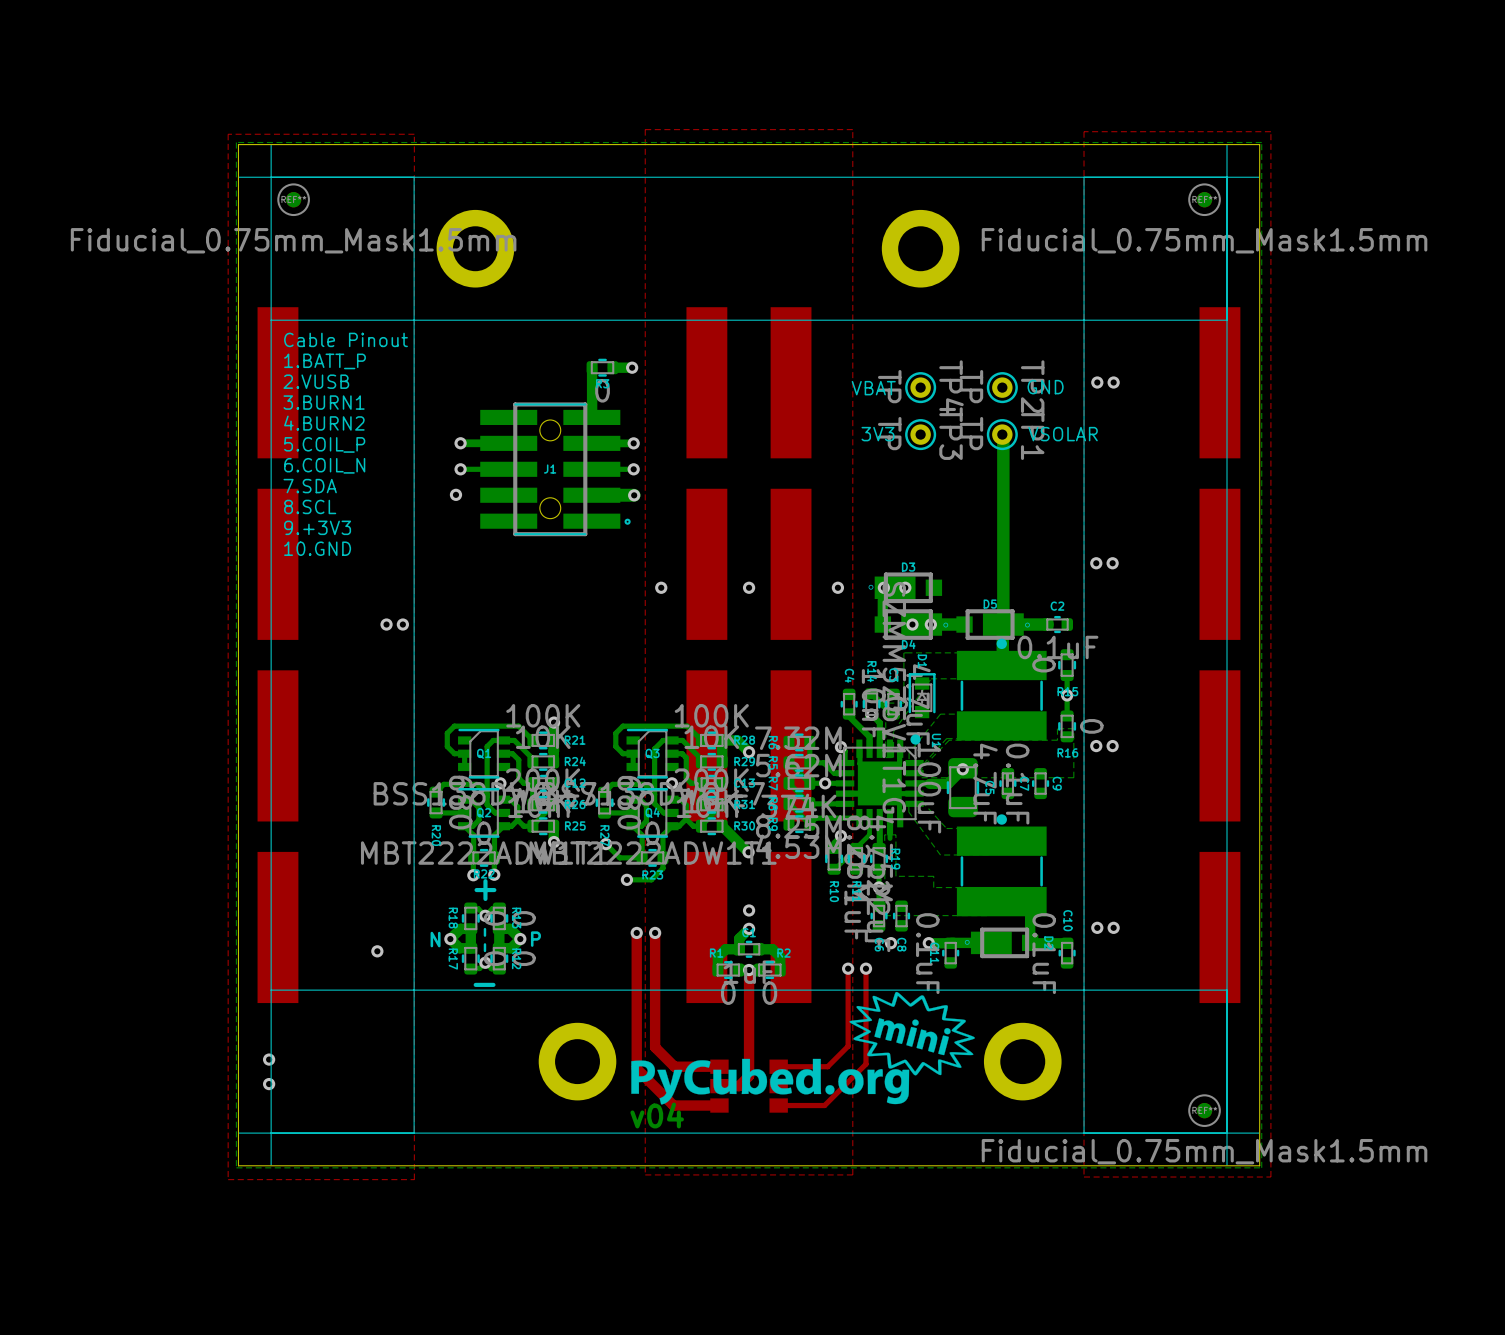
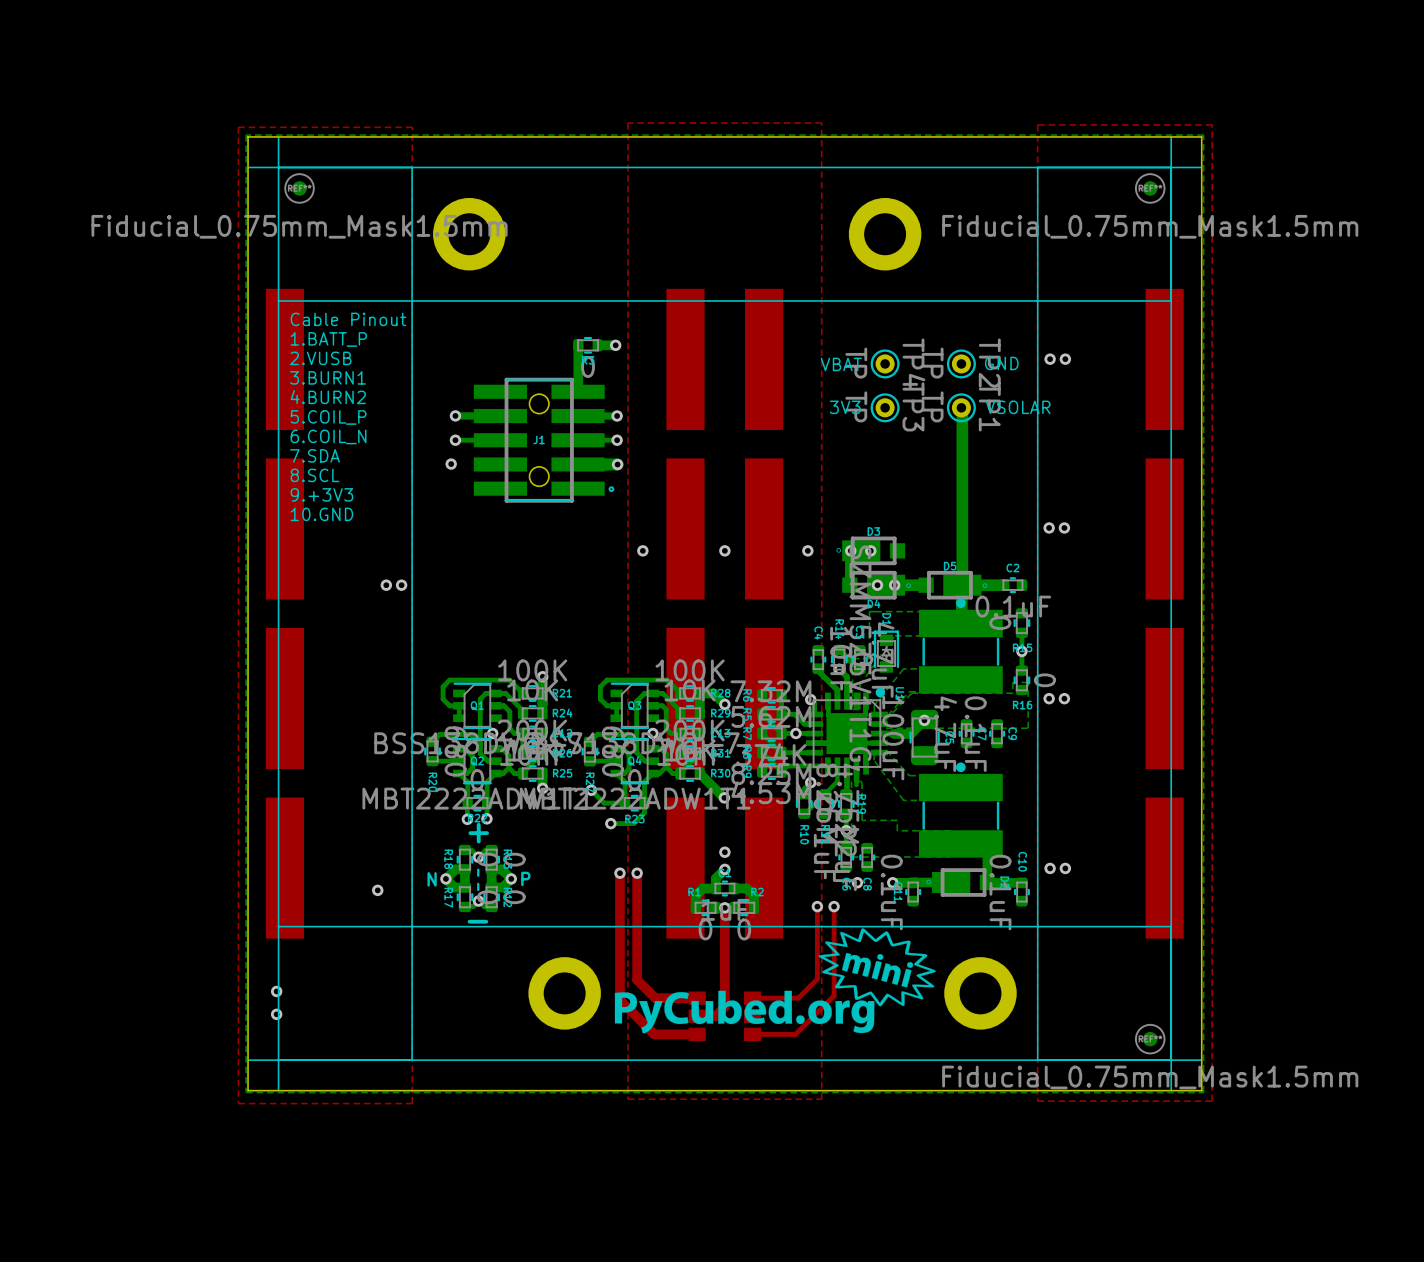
text: v04 (657, 1115) -> none

